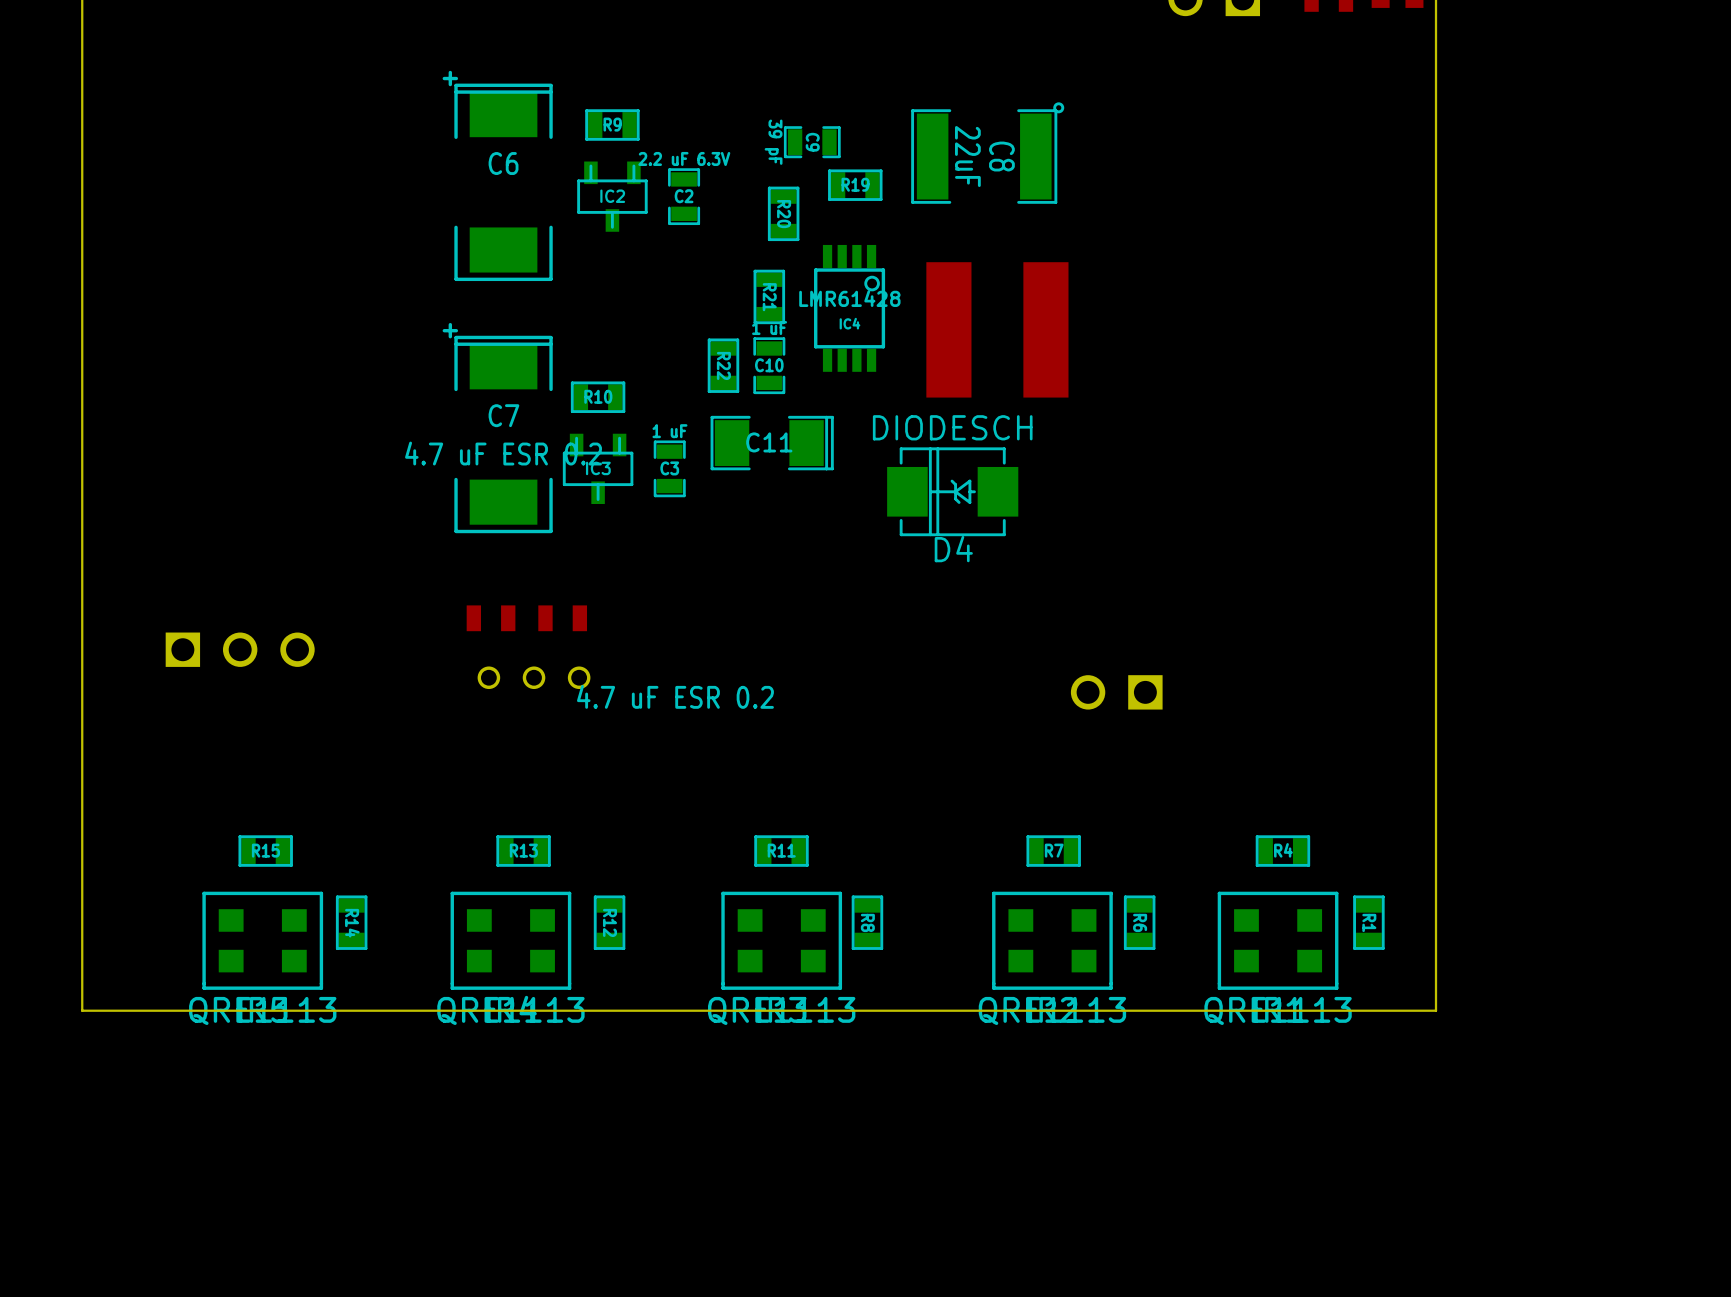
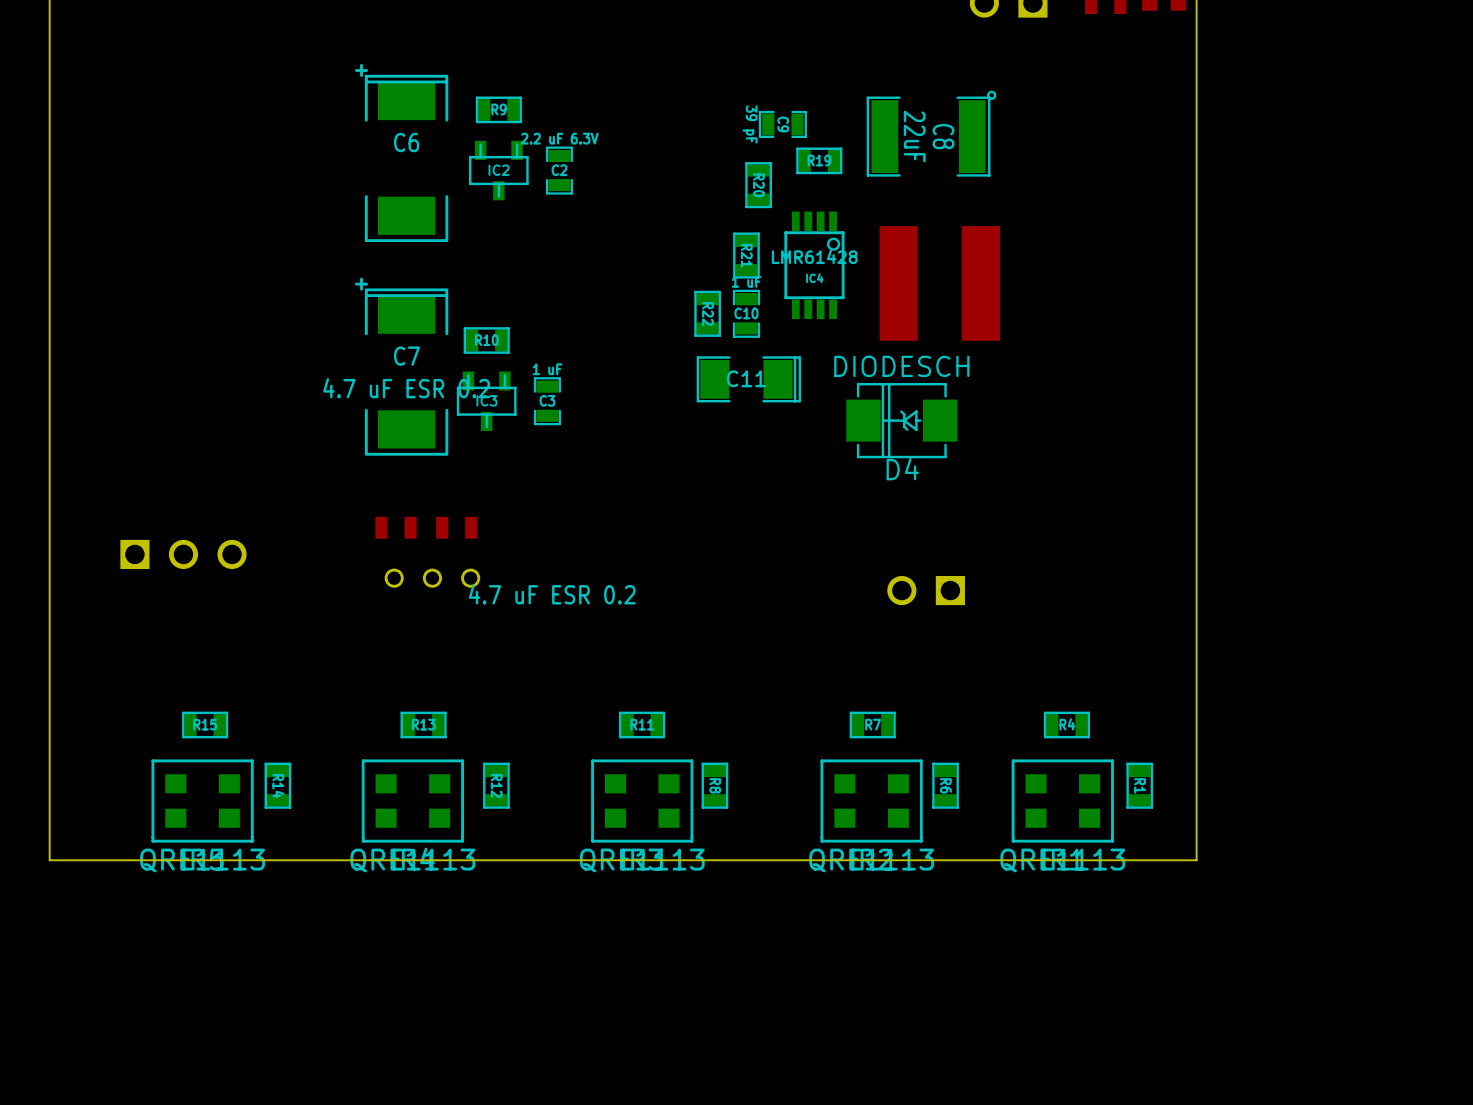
C9 position: (812, 142) -> (782, 124)
C8 position: (987, 153) -> (931, 133)
R19 position: (855, 185) -> (819, 160)
R20 position: (783, 213) -> (758, 185)
R21 position: (769, 296) -> (746, 255)
IC4 position: (849, 308) -> (814, 265)
part position: (997, 329) -> (939, 283)
R22 position: (723, 365) -> (707, 313)
C10 position: (769, 365) -> (746, 313)
C11 position: (772, 443) -> (748, 379)
D4 position: (952, 491) -> (901, 420)

